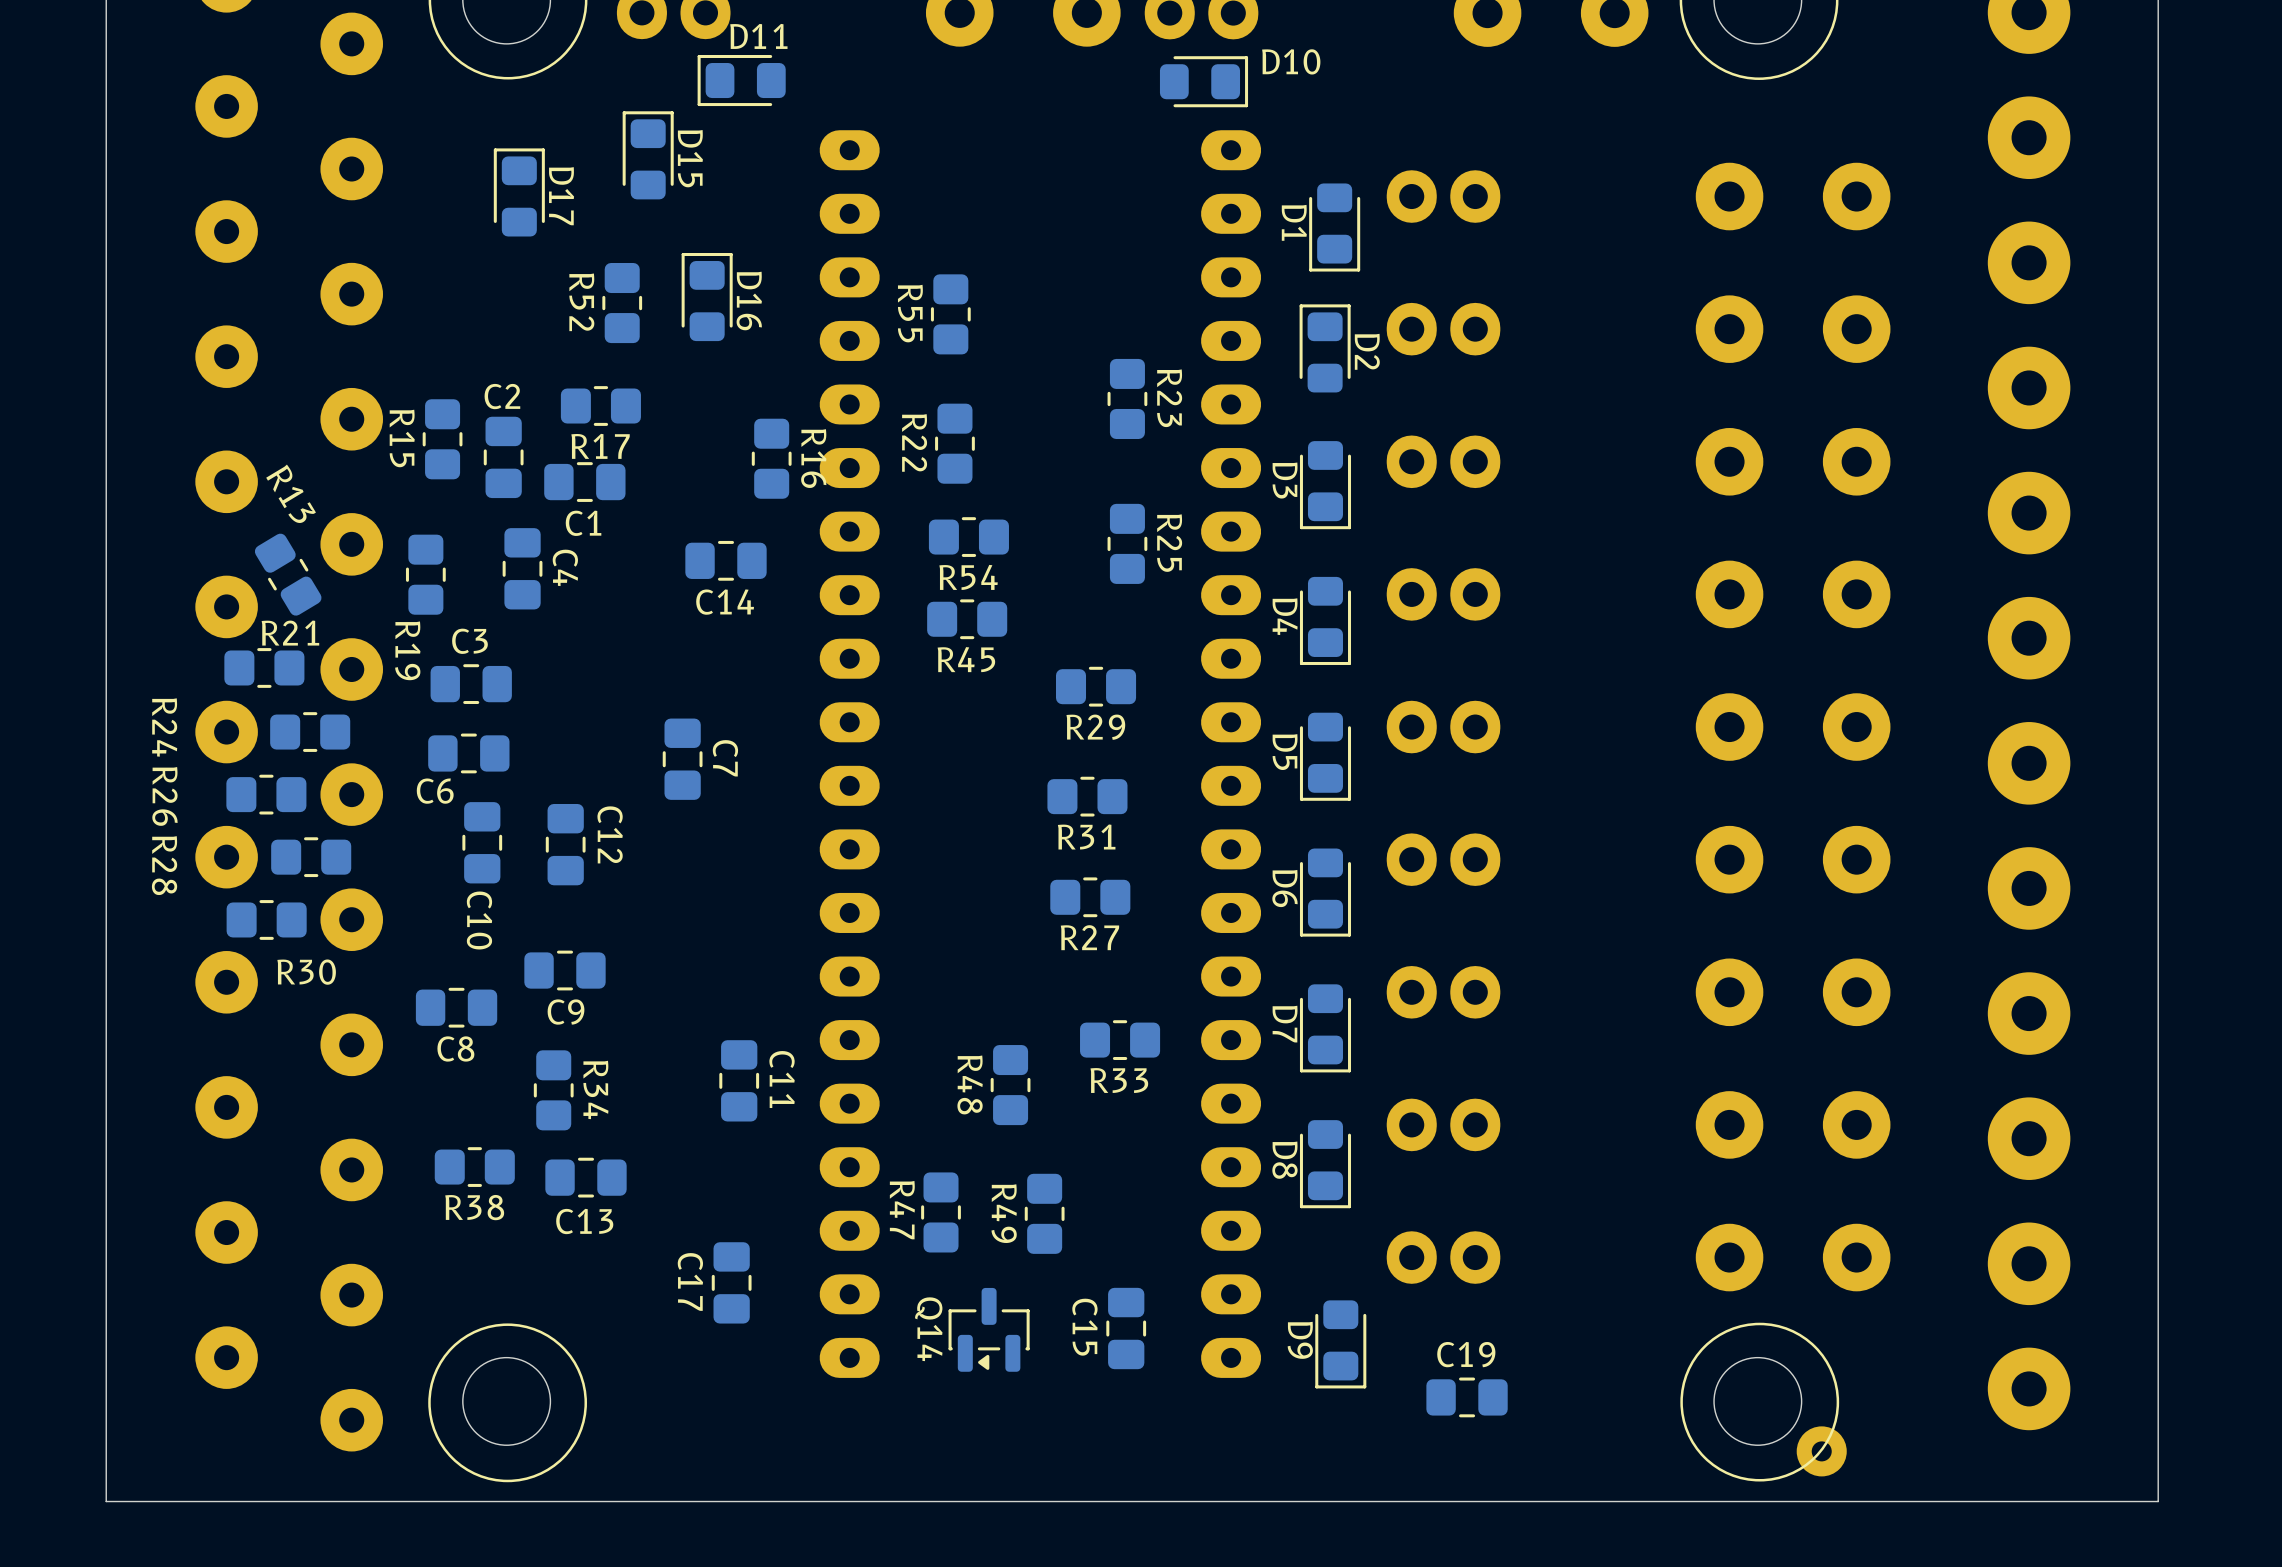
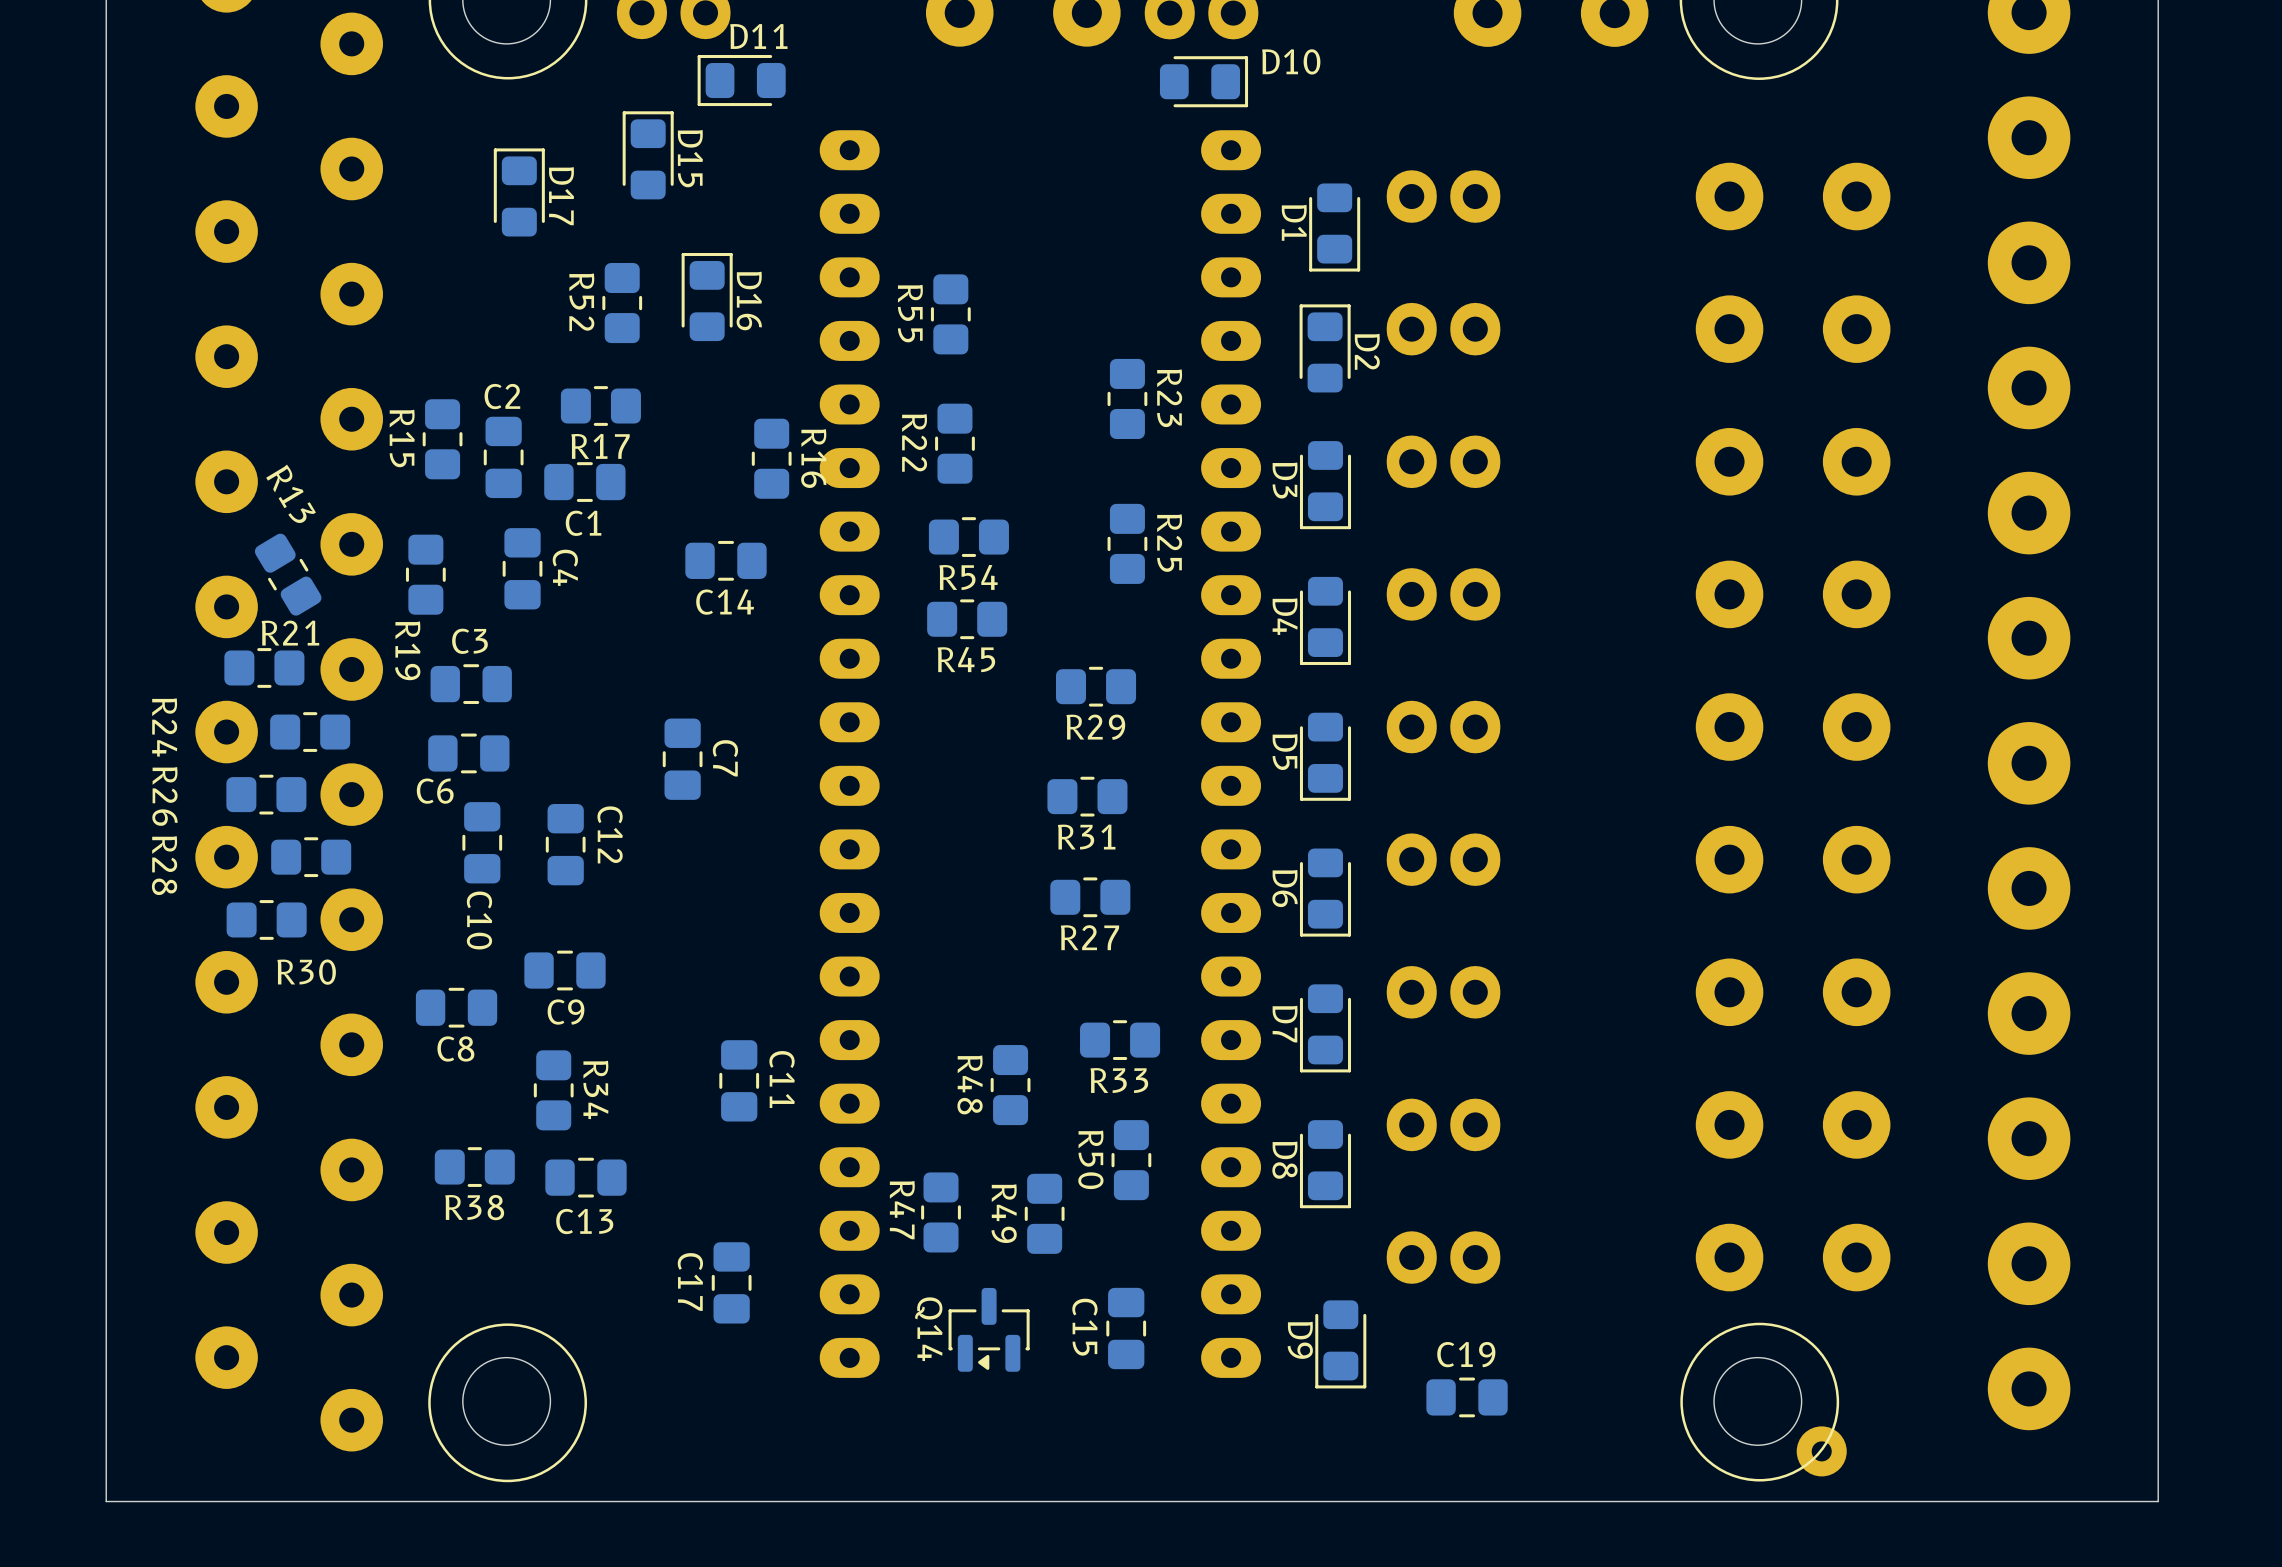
R50: none -> (1131, 1160)

